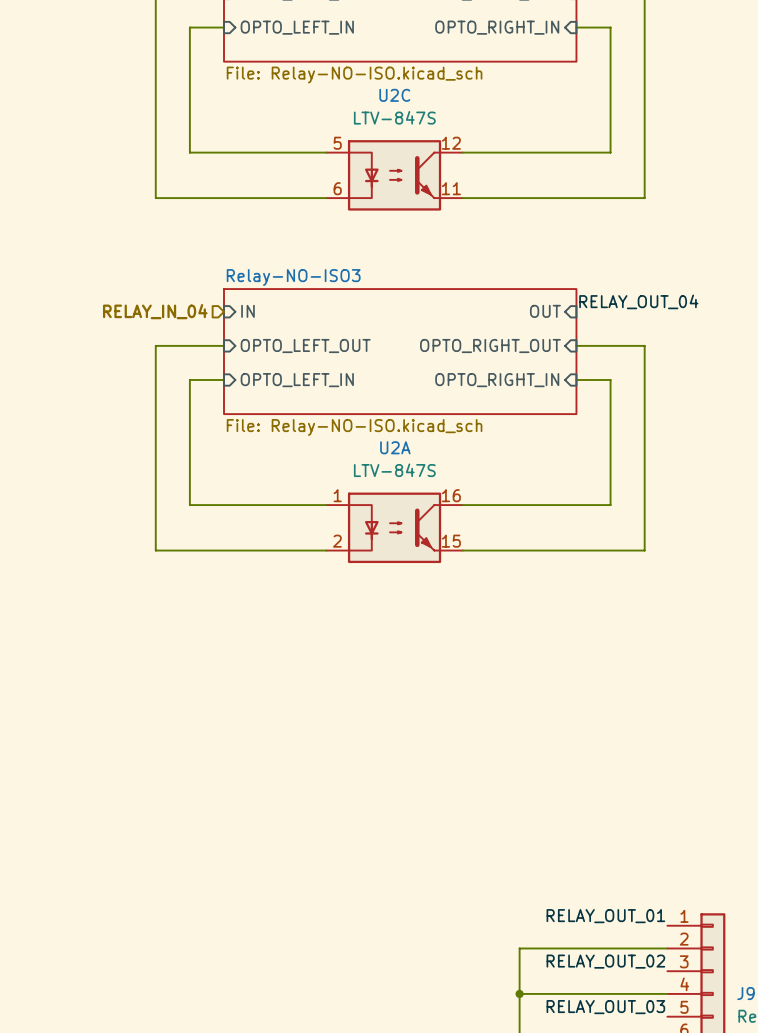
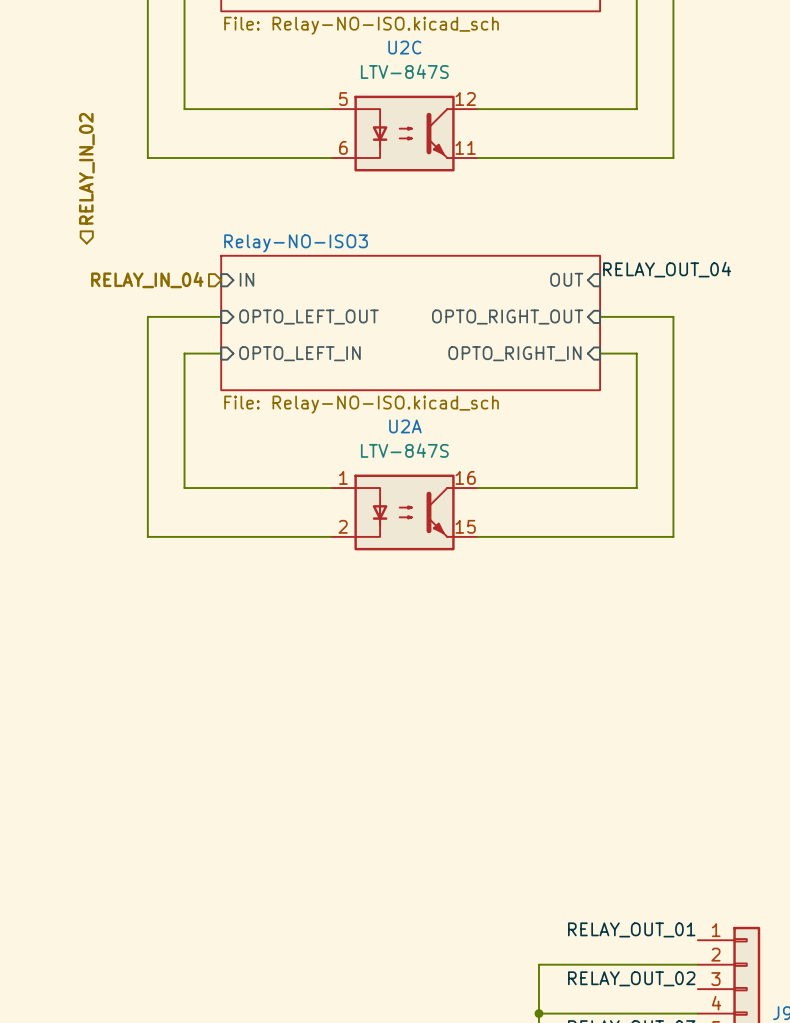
hierarchical label: none -> RELAY_IN_02 (86, 168)

